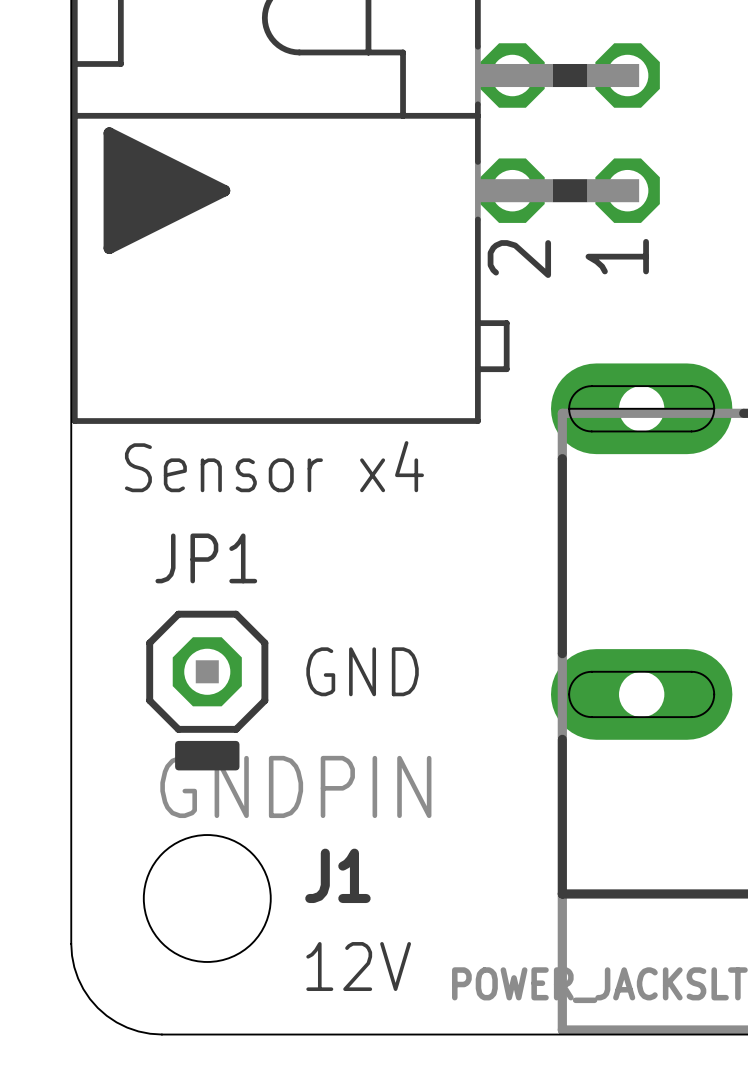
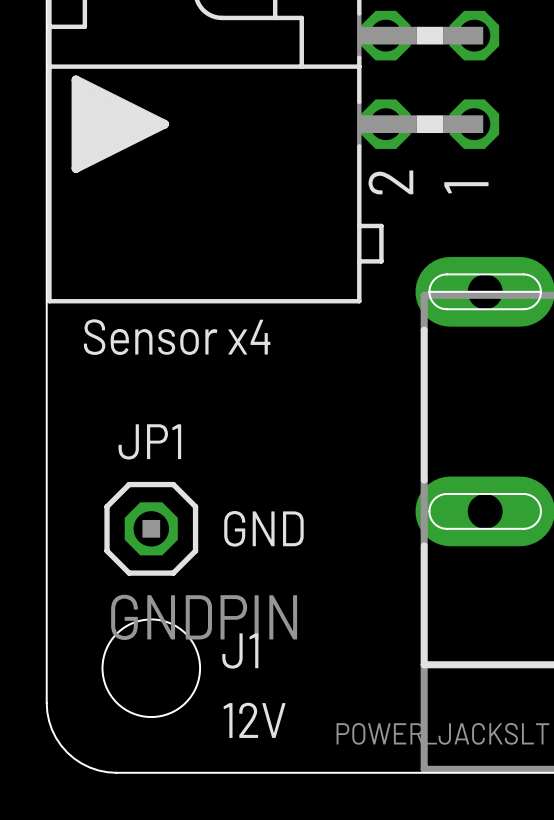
JP1 position: (207, 671) -> (151, 528)
text position: GND (362, 671) -> GND (263, 528)
drawing: [175, 740, 240, 771] -> none

